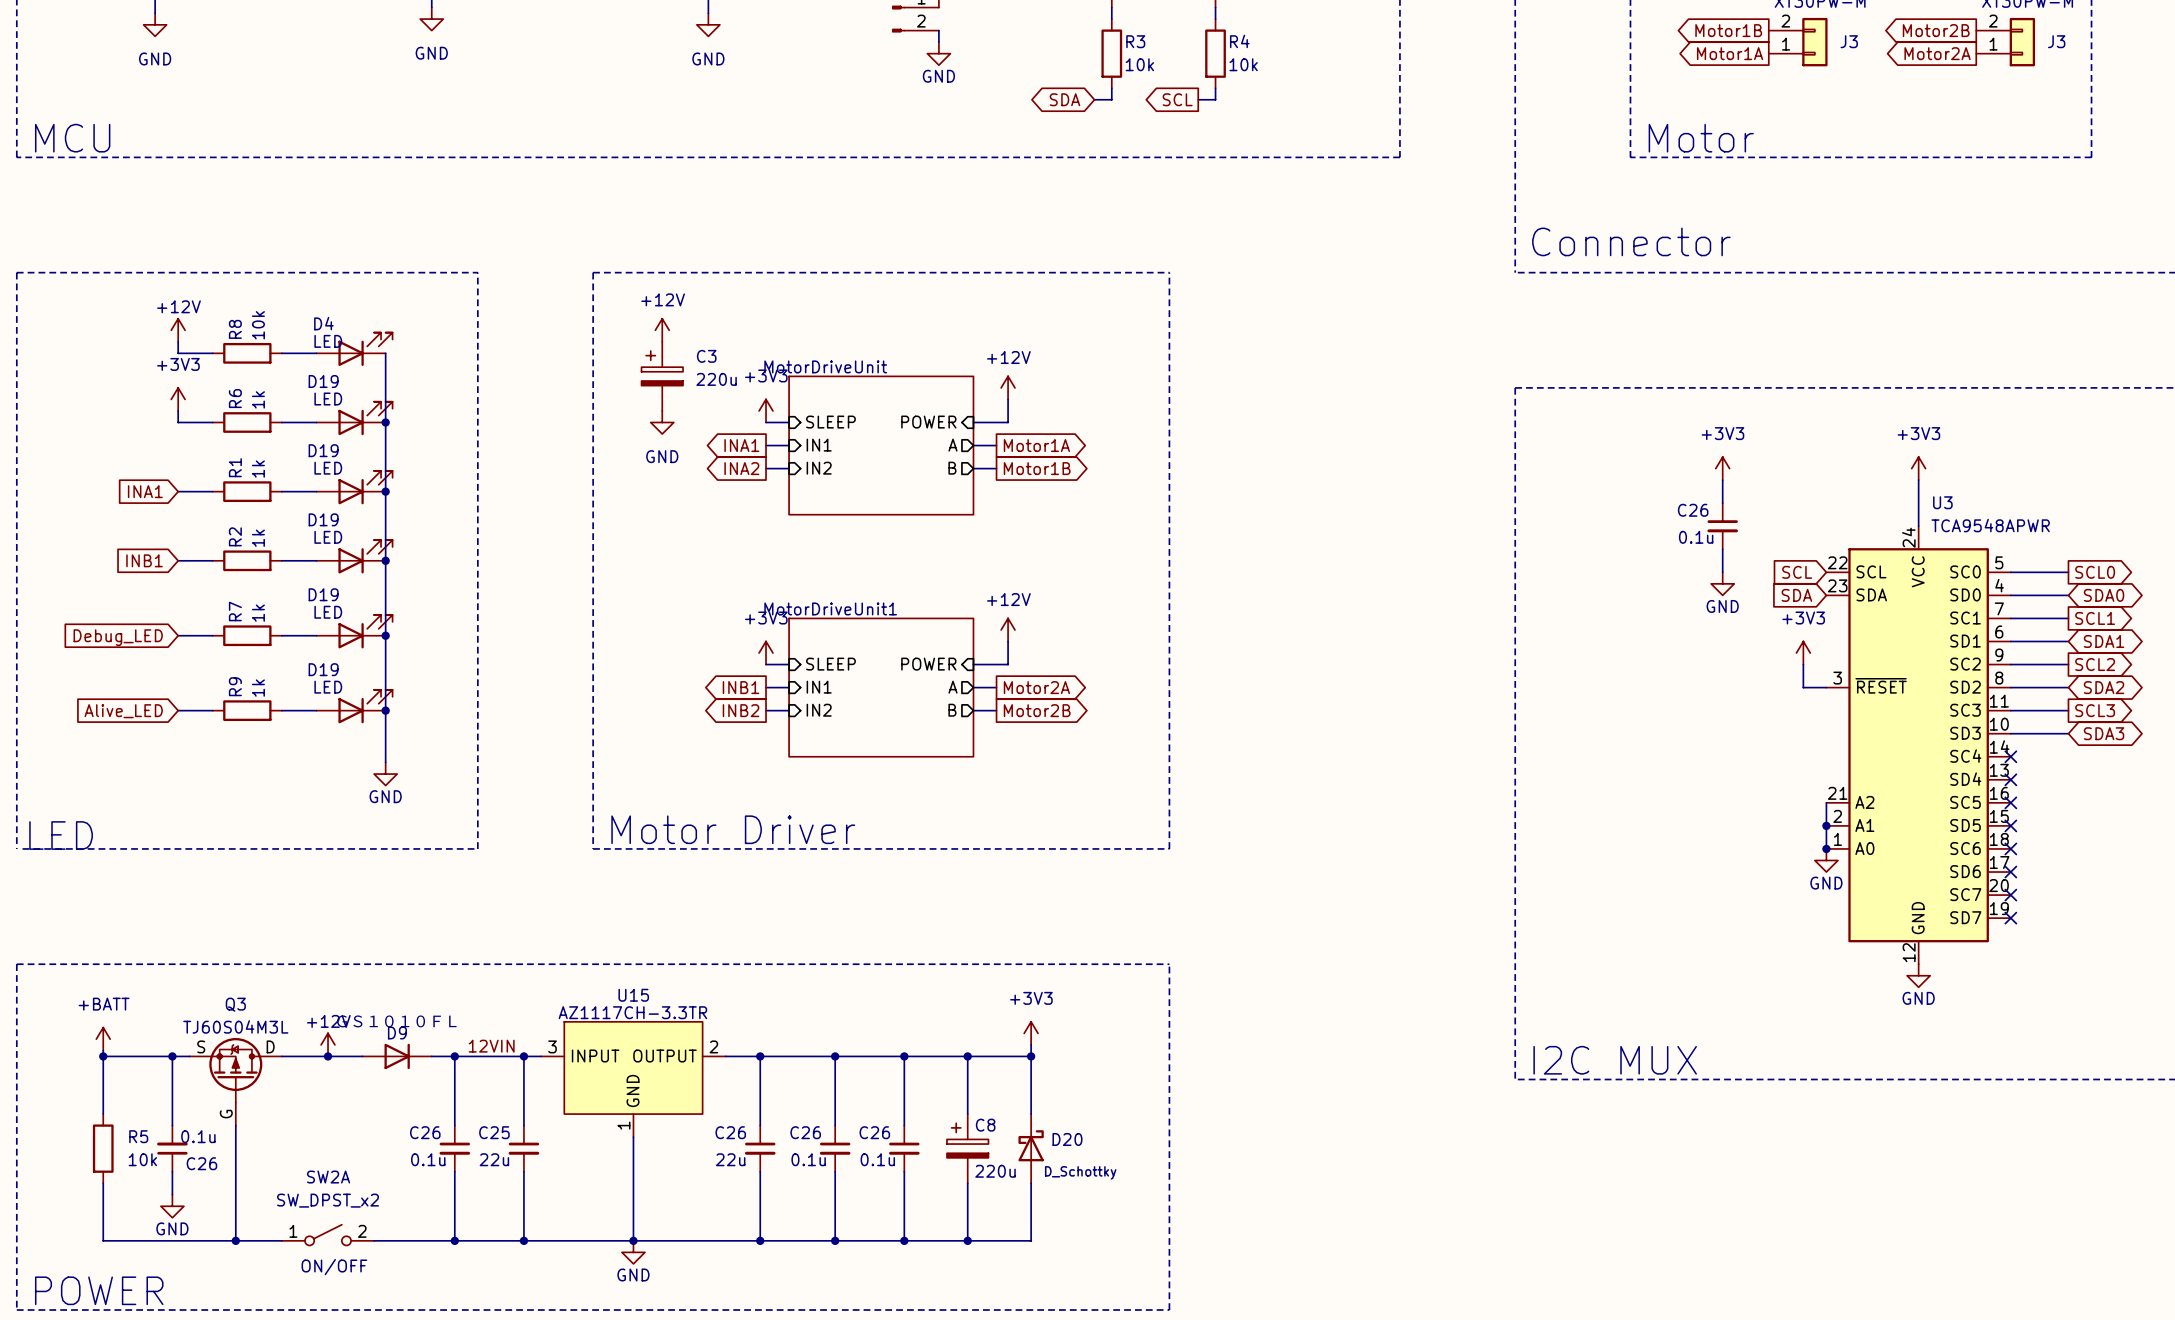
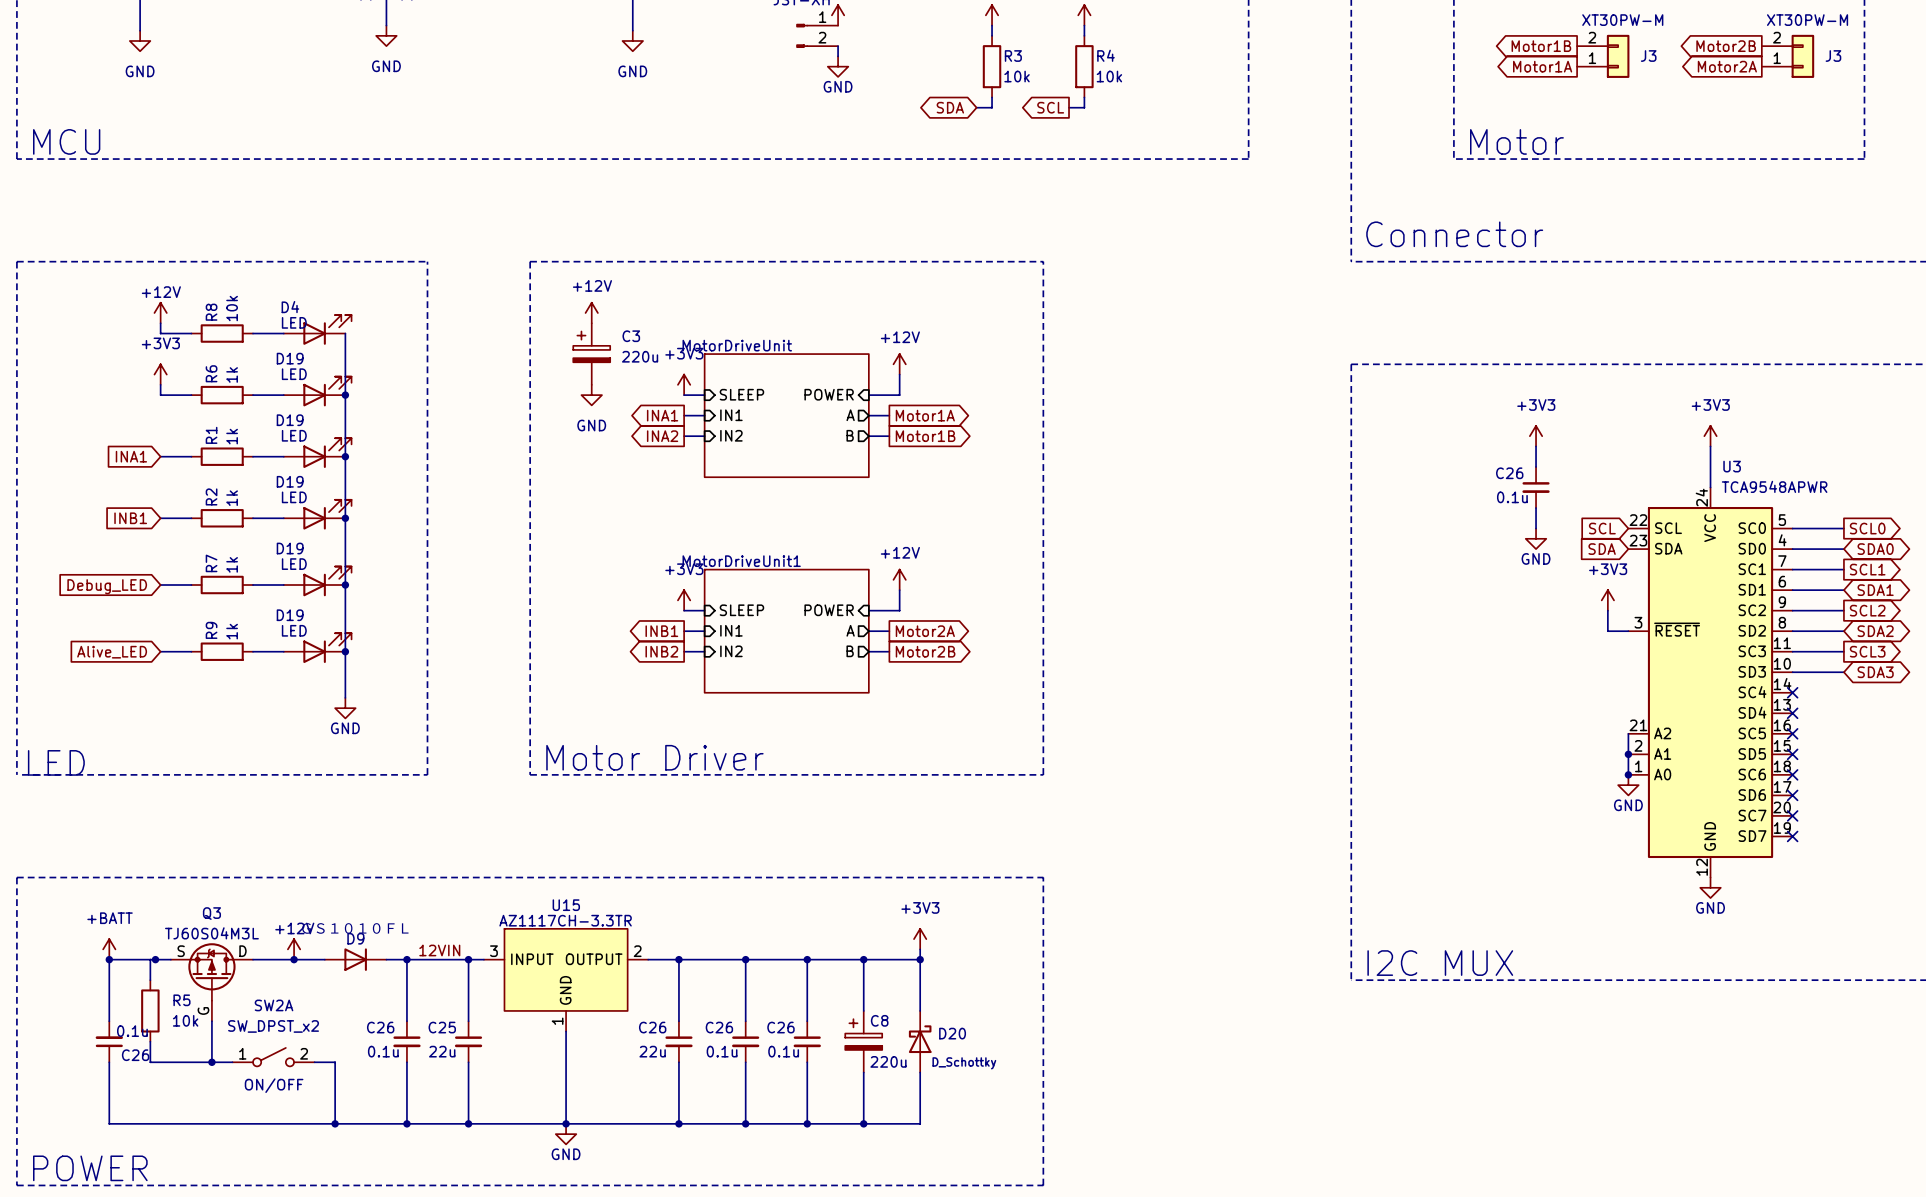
power symbol position: +BATT (103, 1039) -> +BATT (109, 949)
wire: (103, 1050) (103, 1114) -> none
wire: (103, 1056) (120, 1056) -> (109, 1021) (109, 959)
junction position: (103, 1056) -> (109, 959)
wire: (172, 1056) (172, 1125) -> none
R5 position: (103, 1148) -> (150, 1010)
wire: none -> (150, 1041) (150, 1062) (232, 1062)
C26 position: (172, 1148) -> (109, 1041)
wire: (172, 1171) (172, 1194) -> (150, 959) (150, 980)
wire: (235, 1171) (235, 1240) -> none
junction: none -> (211, 1062)
wire: none -> (314, 1062) (335, 1062) (335, 1123) (253, 1123)
wire: (103, 1183) (103, 1240) (120, 1240) -> (109, 1062) (109, 1123)
power symbol: GND (172, 1206) -> none
SW2A position: (328, 1235) -> (273, 1057)
junction: (235, 1240) -> none
junction: none -> (335, 1123)
text position: ON/OFF (334, 1267) -> ON/OFF (274, 1085)

